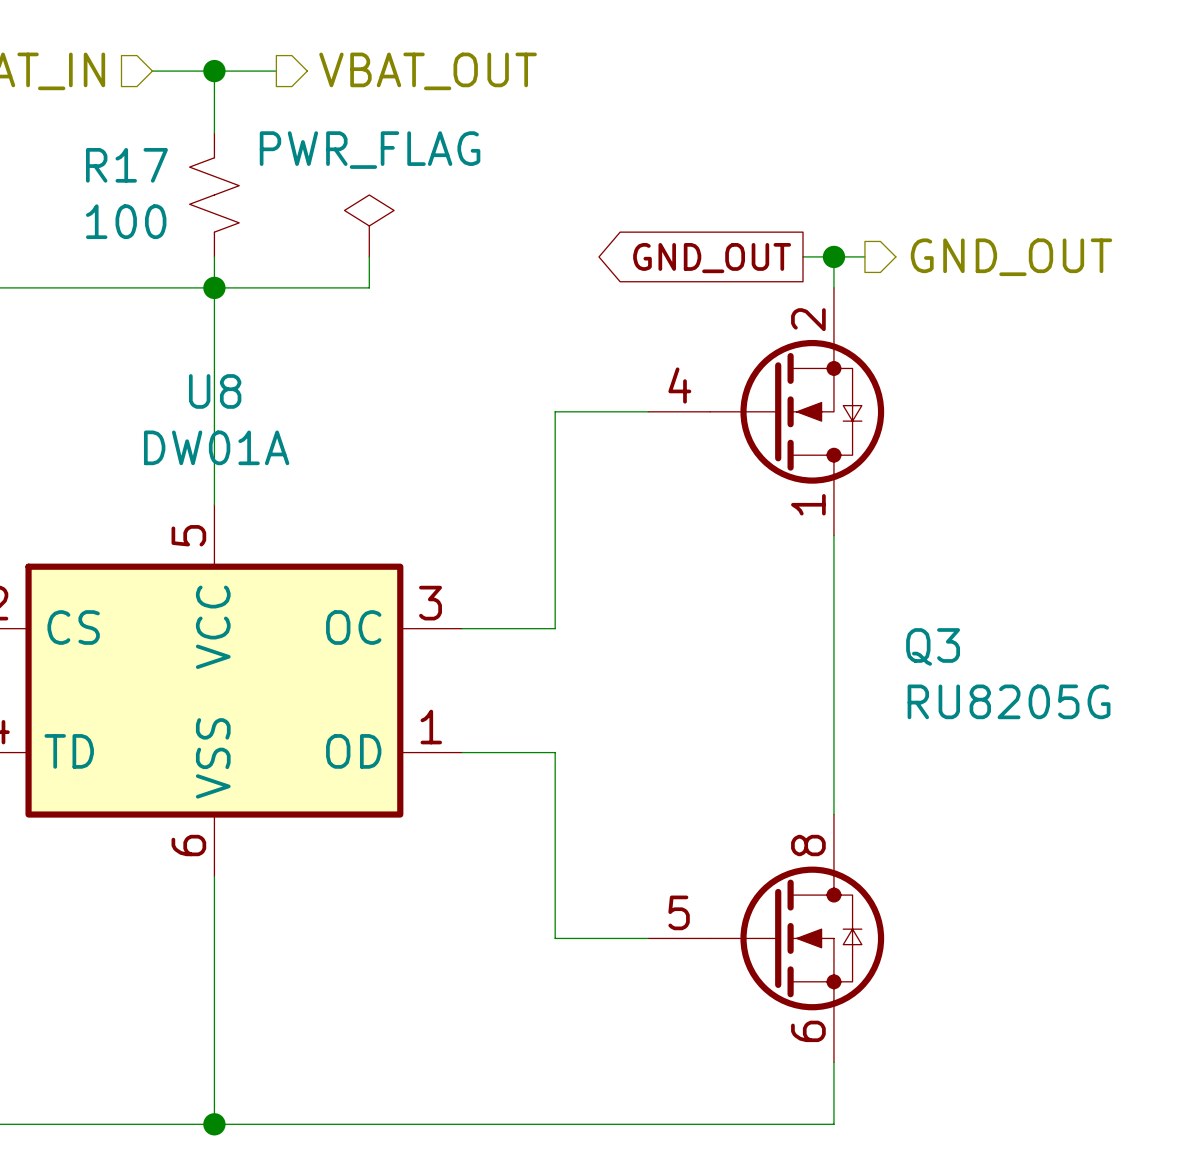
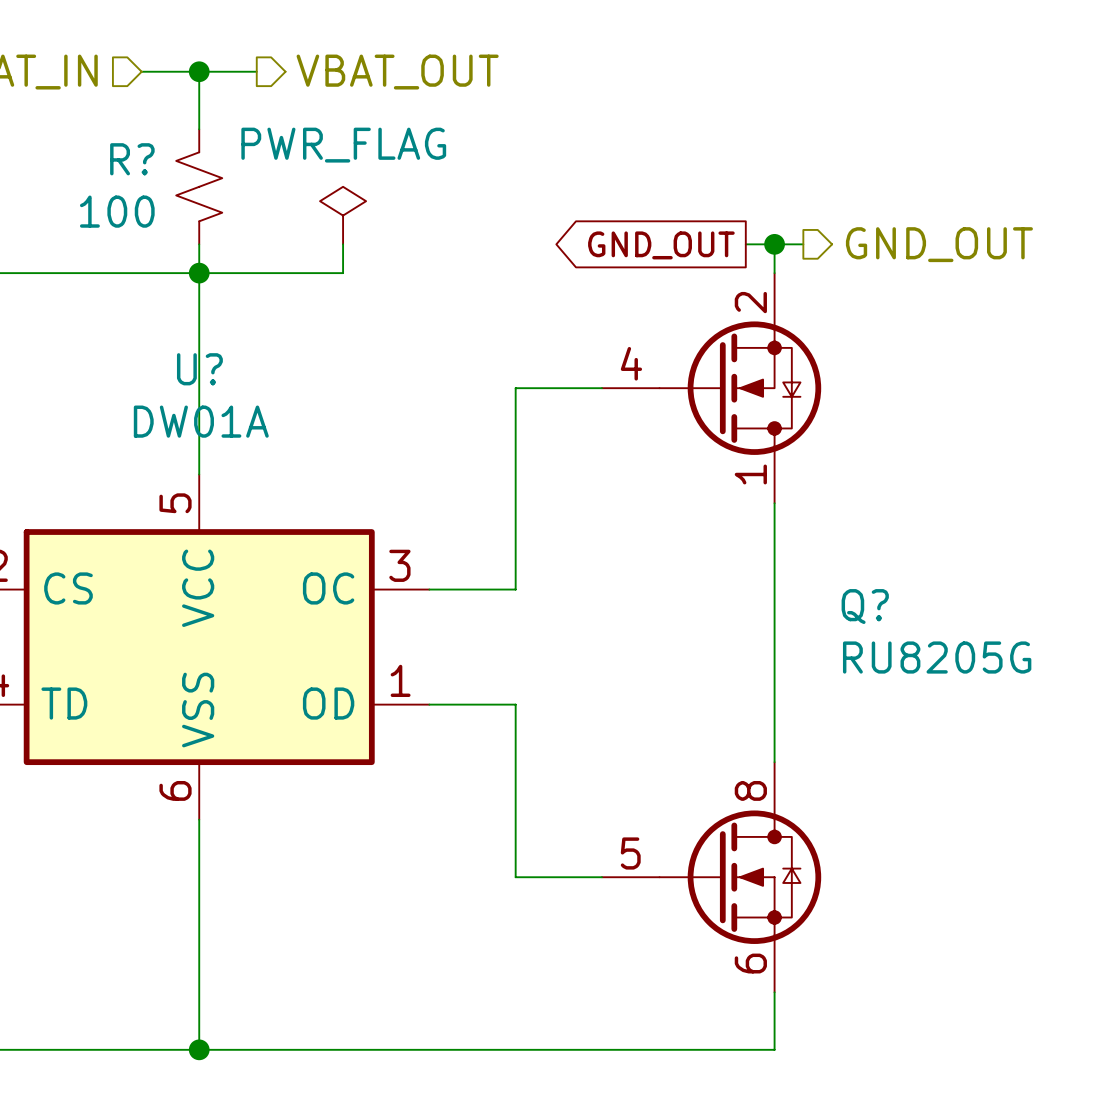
R17 name: R17 (126, 165) -> R? (132, 159)
U8 name: U8 (215, 391) -> U? (199, 369)
Q3 name: Q3 (933, 646) -> Q? (865, 606)

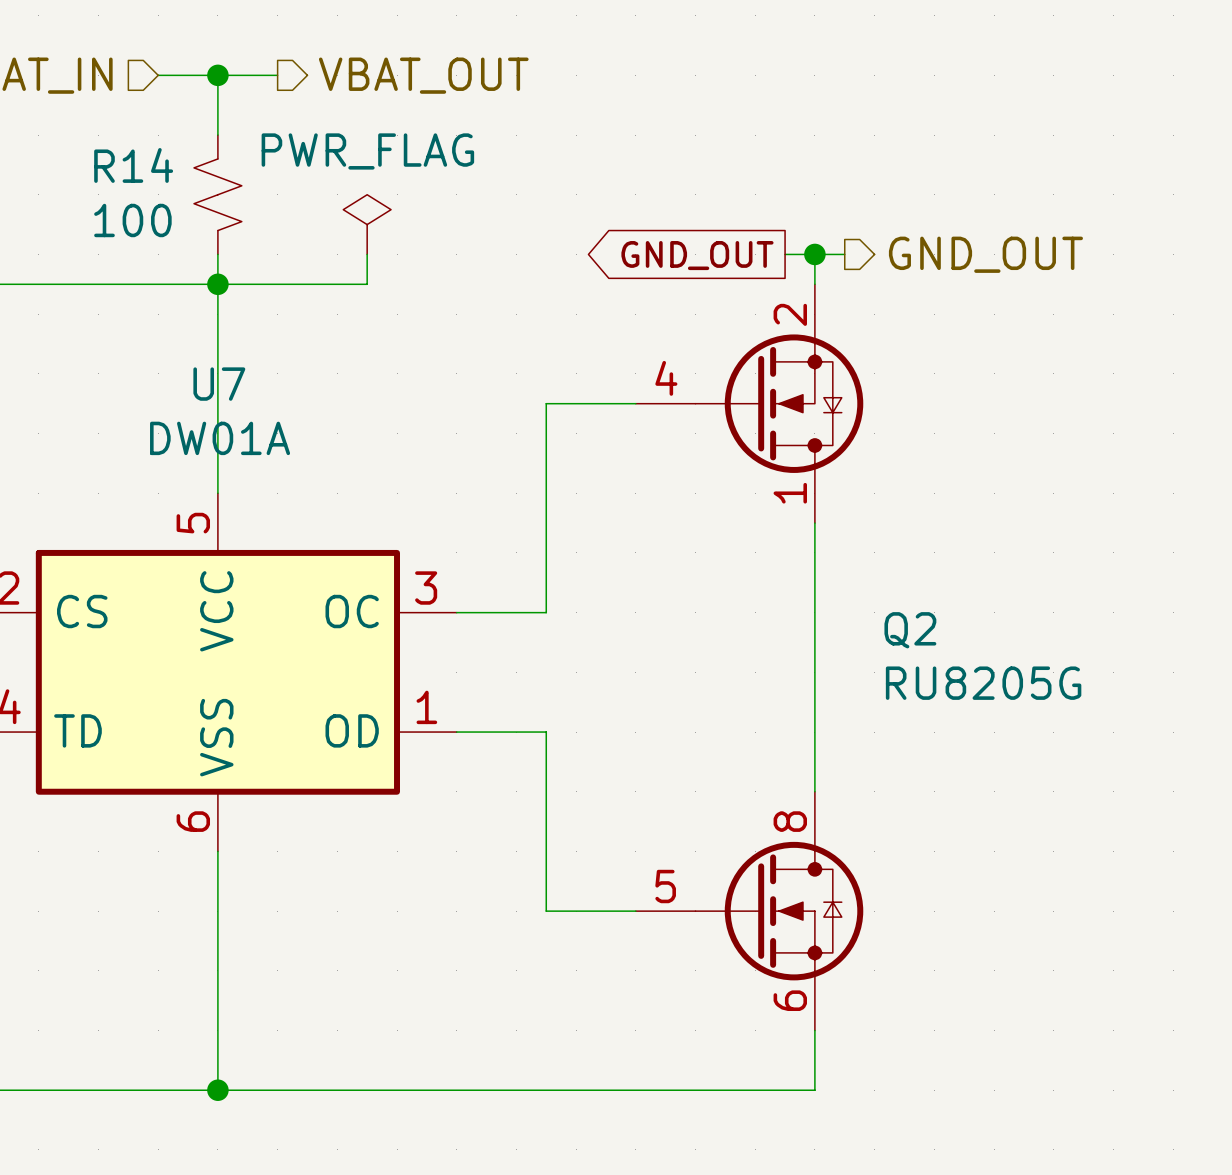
R? name: R? (132, 159) -> R14 (133, 165)
U? name: U? (199, 369) -> U7 (219, 384)
Q? name: Q? (865, 606) -> Q2 (910, 630)

